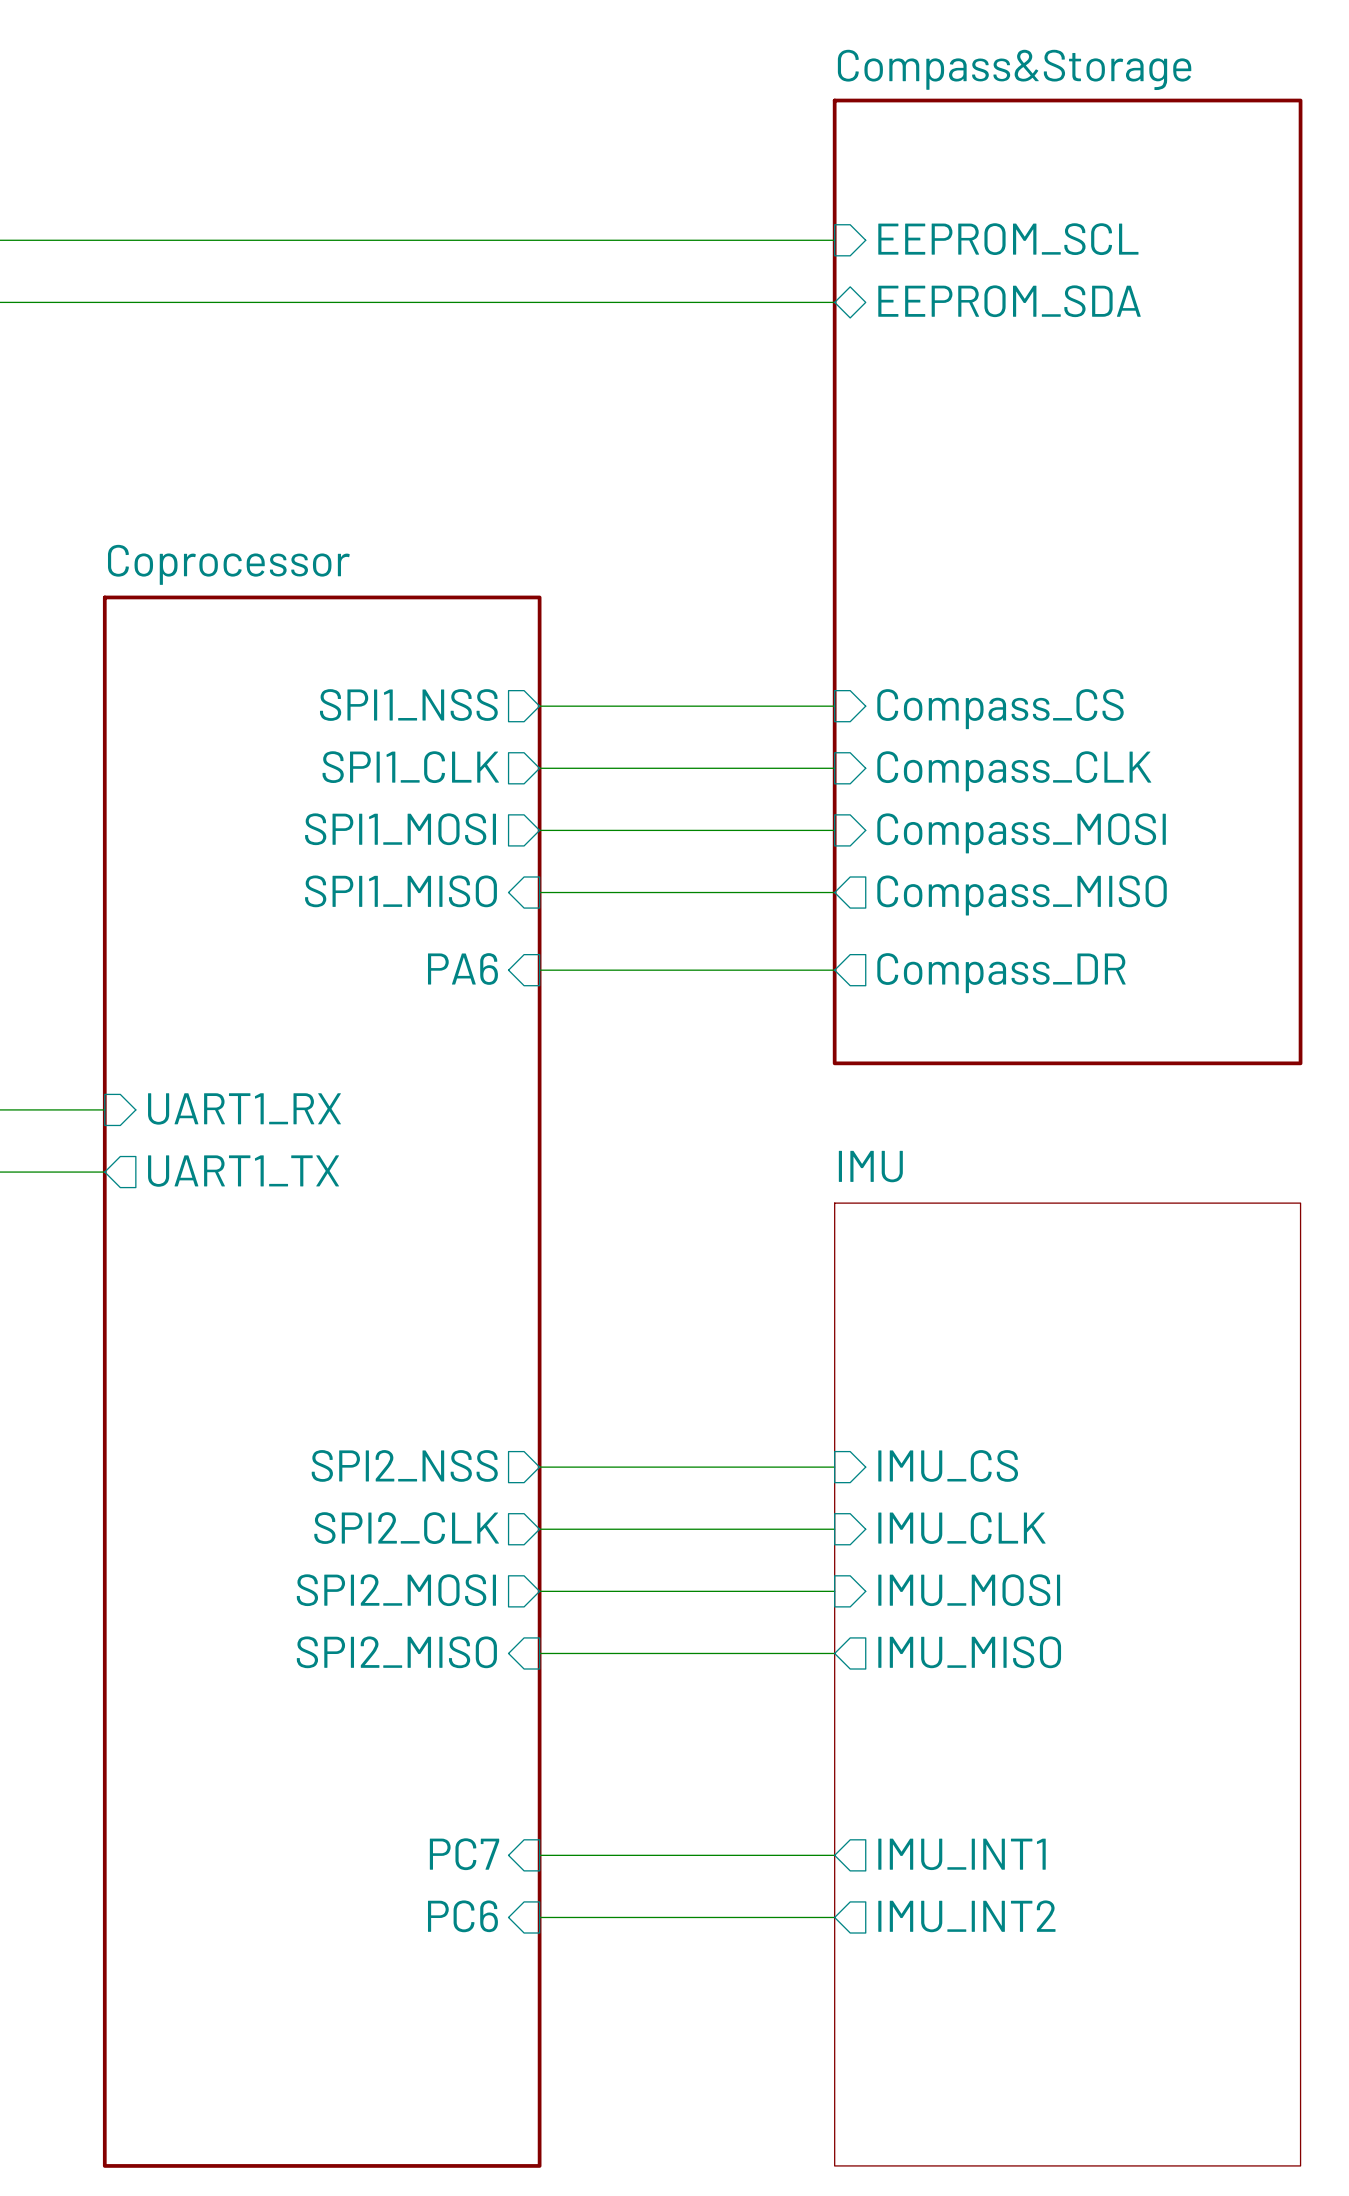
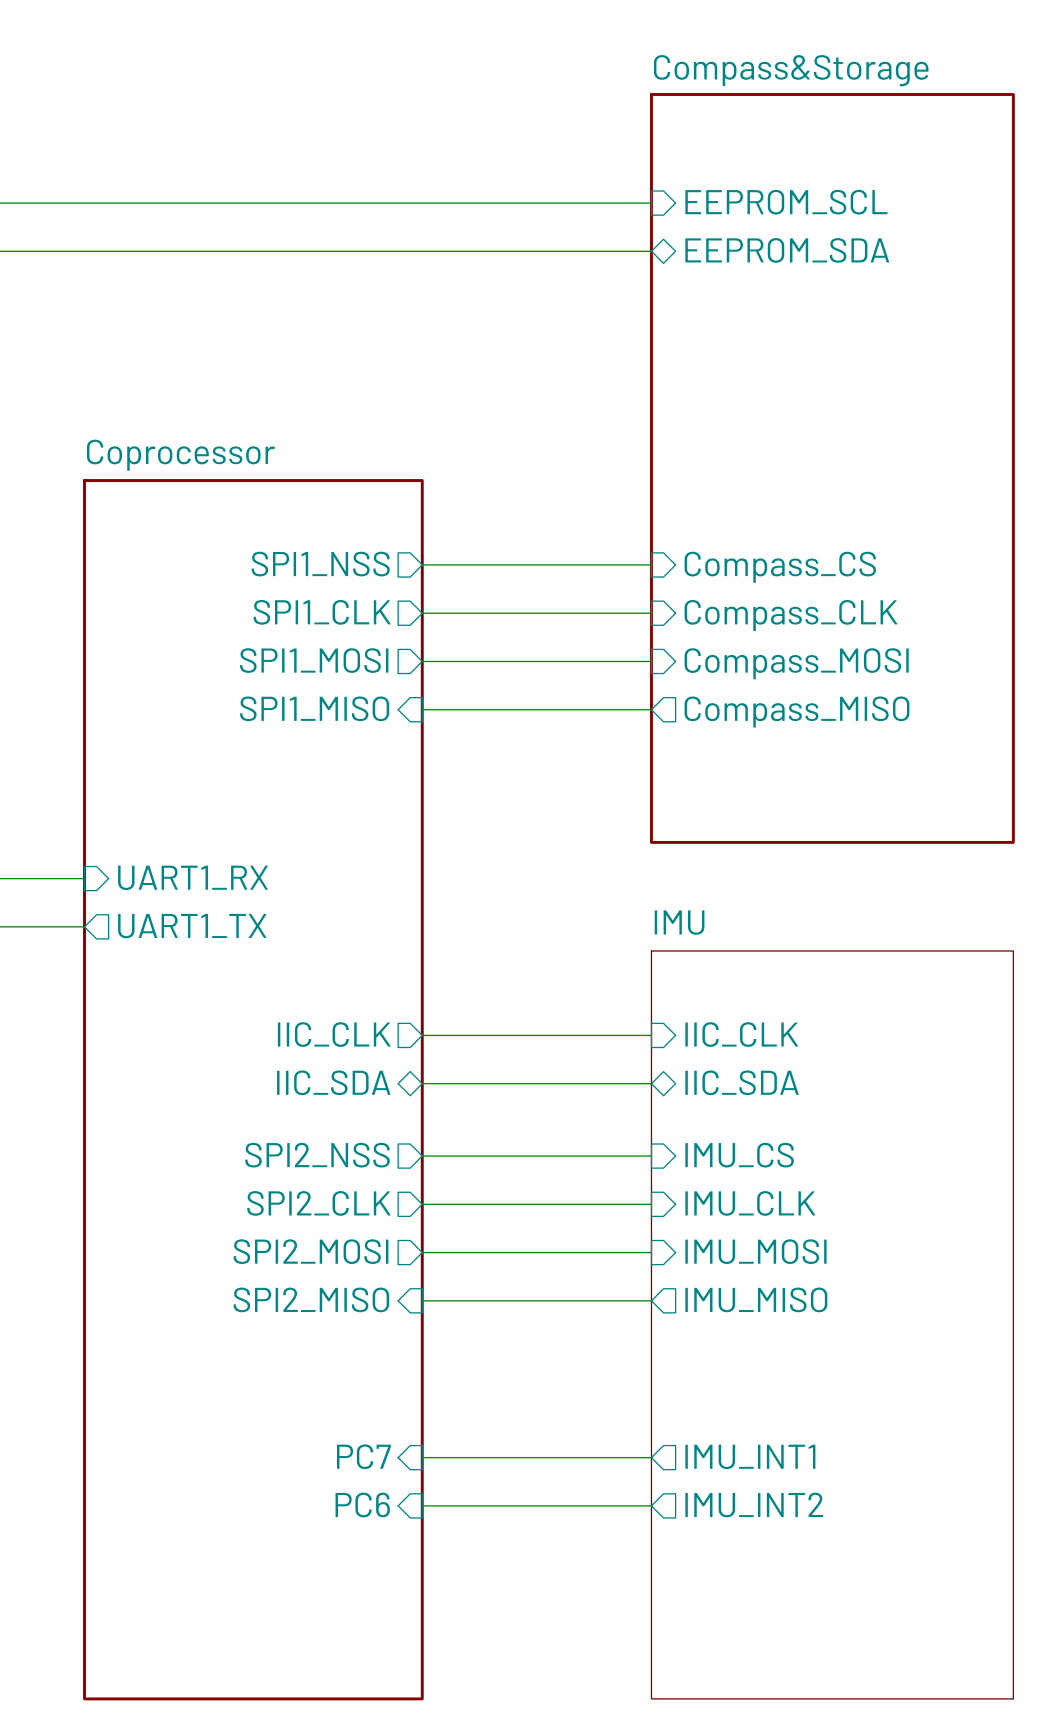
sheet pin: PA6 (462, 968) -> none
wire: (539, 970) (834, 970) -> (422, 1035) (651, 1035)
sheet pin: Compass_DR (1001, 973) -> none
sheet pin: none -> IIC_CLK (334, 1034)
sheet pin: none -> IIC_CLK (741, 1034)
sheet pin: none -> IIC_SDA (333, 1082)
sheet pin: none -> IIC_SDA (742, 1082)
wire: none -> (422, 1083) (651, 1083)

